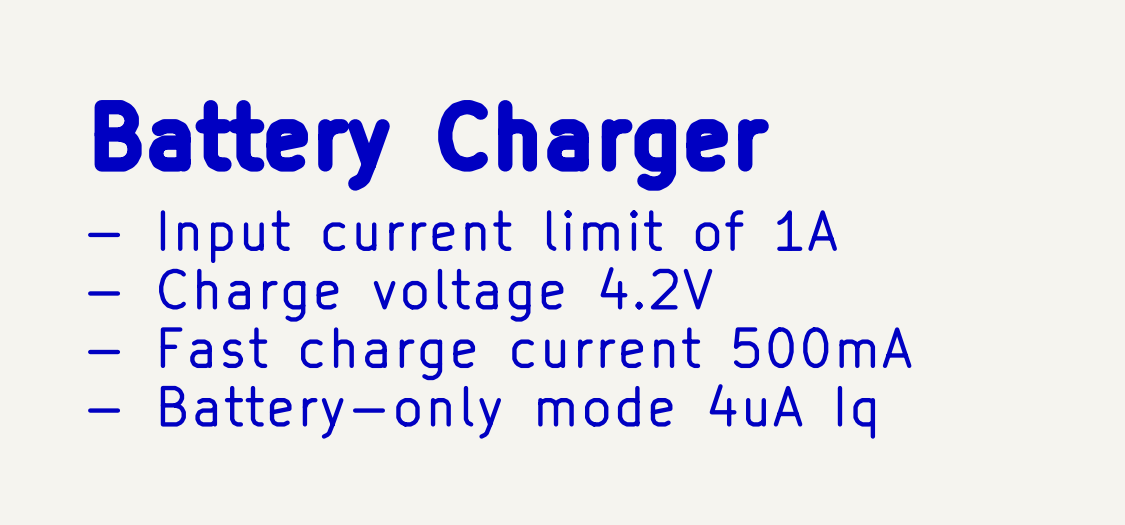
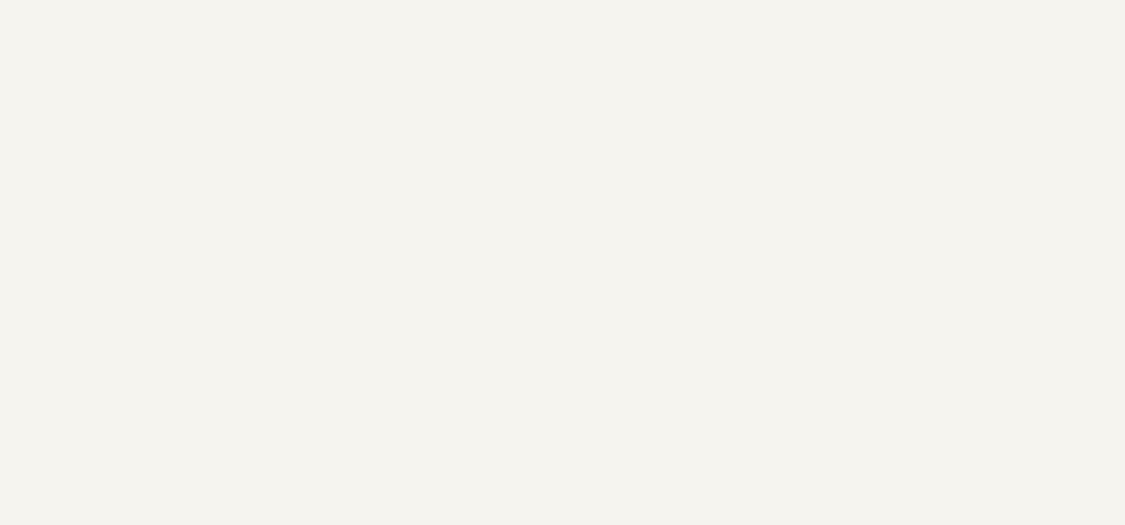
text: Battery Charger (431, 145) -> none
text: - Input current limit of 1A (462, 236) -> none
text: - Charge voltage 4.2V (400, 294) -> none
text: - Fast charge current 500mA (499, 353) -> none
text: - Battery-only mode 4uA Iq (481, 411) -> none

